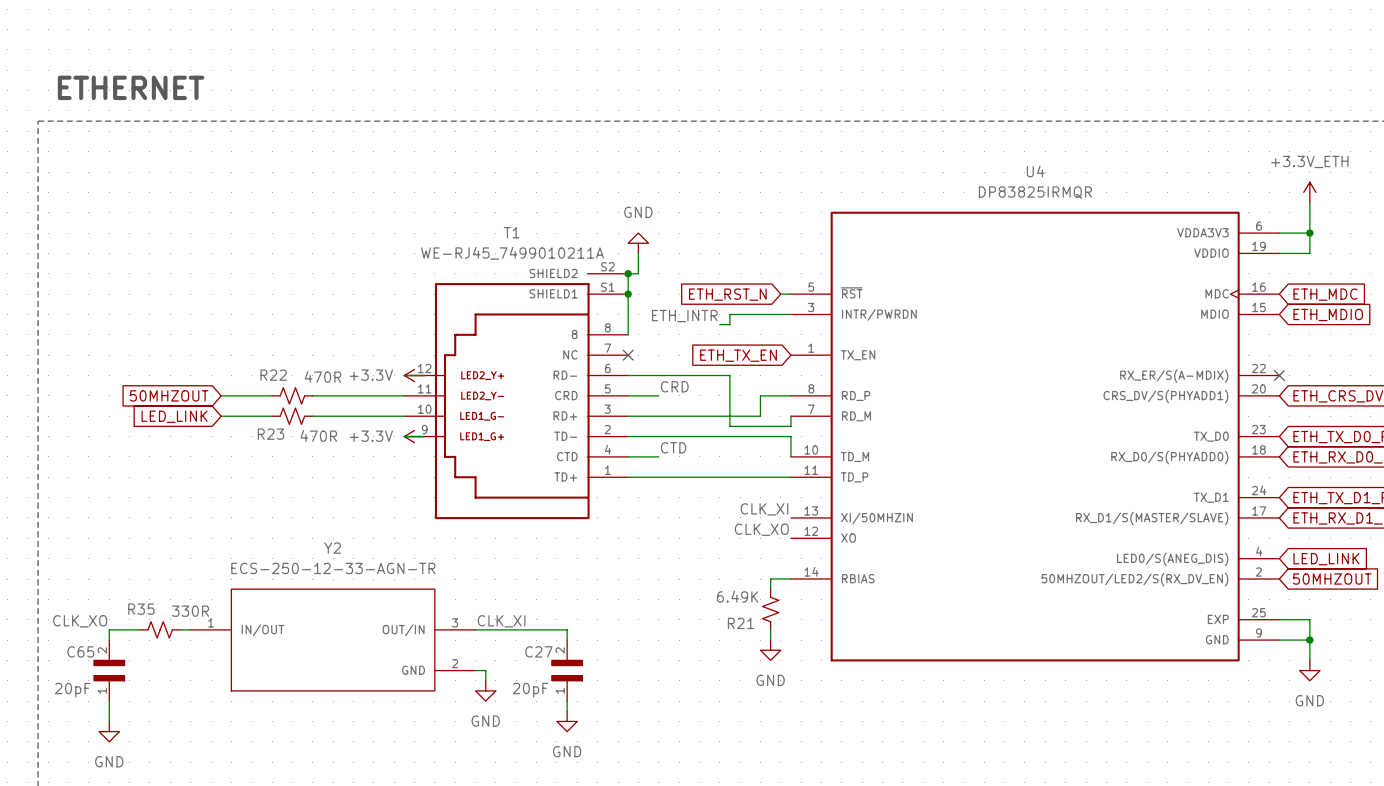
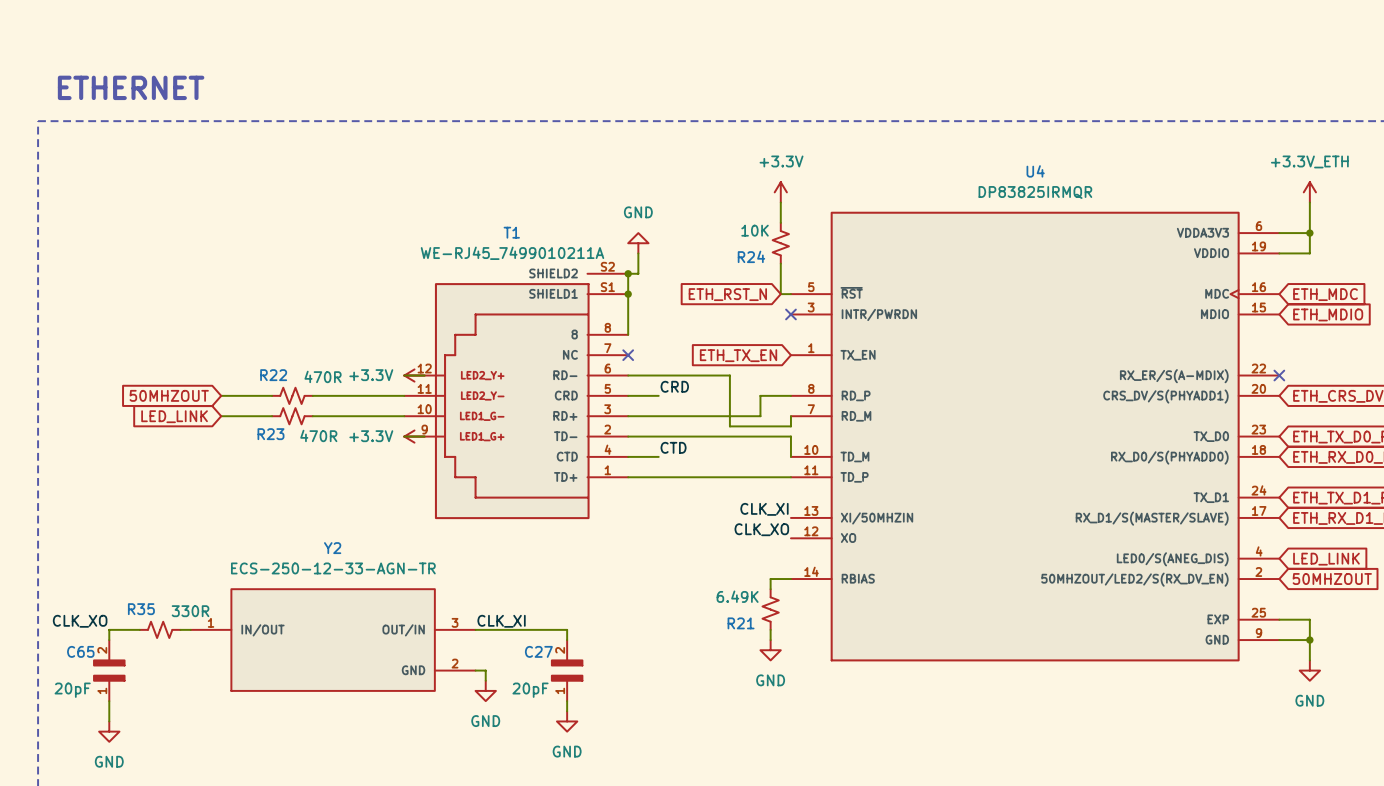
power symbol: none -> +3.3V (780, 192)
wire: none -> (780, 202) (780, 222)
R24: none -> 10K (780, 243)
wire: none -> (780, 263) (780, 294)
wire: (790, 314) (729, 314) (729, 324) (719, 324) -> none
no-connect mark: none -> (790, 314)
label: ETH_INTR (684, 316) -> none

